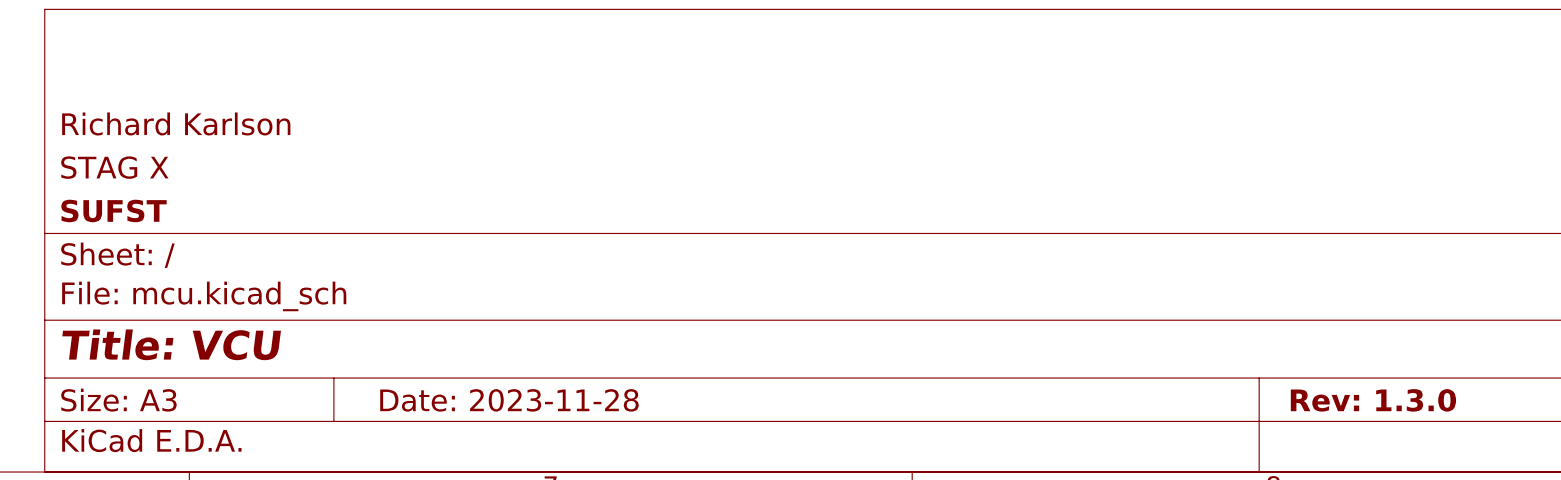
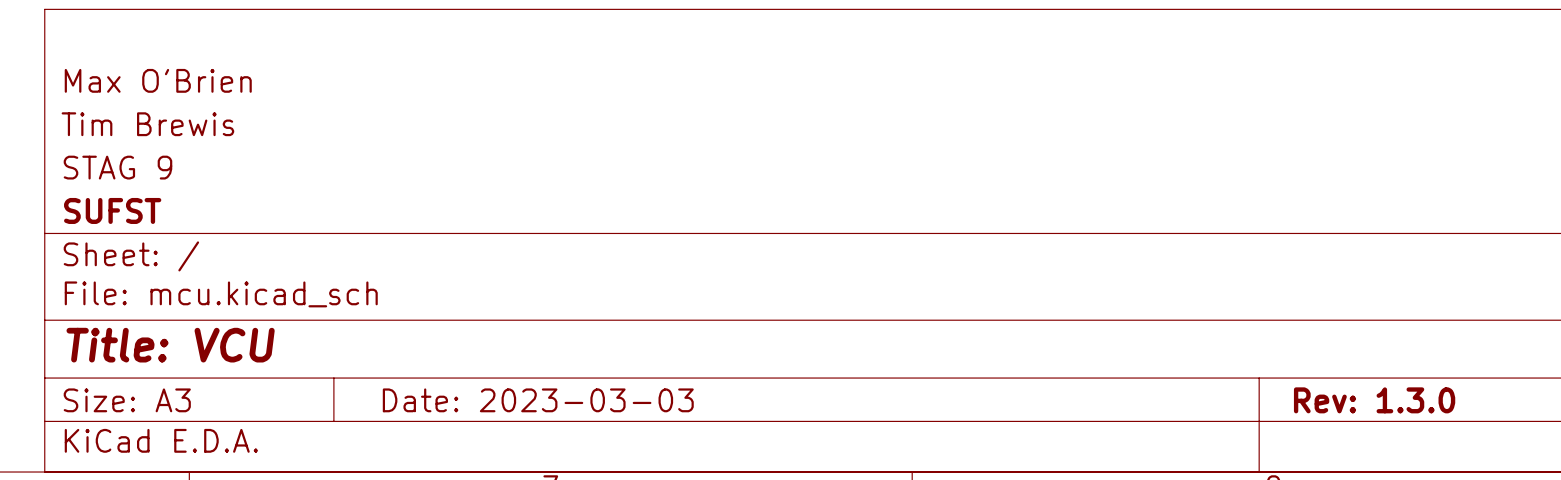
title block: none -> Max O'Brien (158, 80)
title block: Richard Karlson (176, 123) -> Tim Brewis (147, 124)
title block: STAG X (114, 167) -> STAG 9 (117, 167)
title block: Date: 2023-11-28 (509, 400) -> Date: 2023-03-03 (538, 400)

